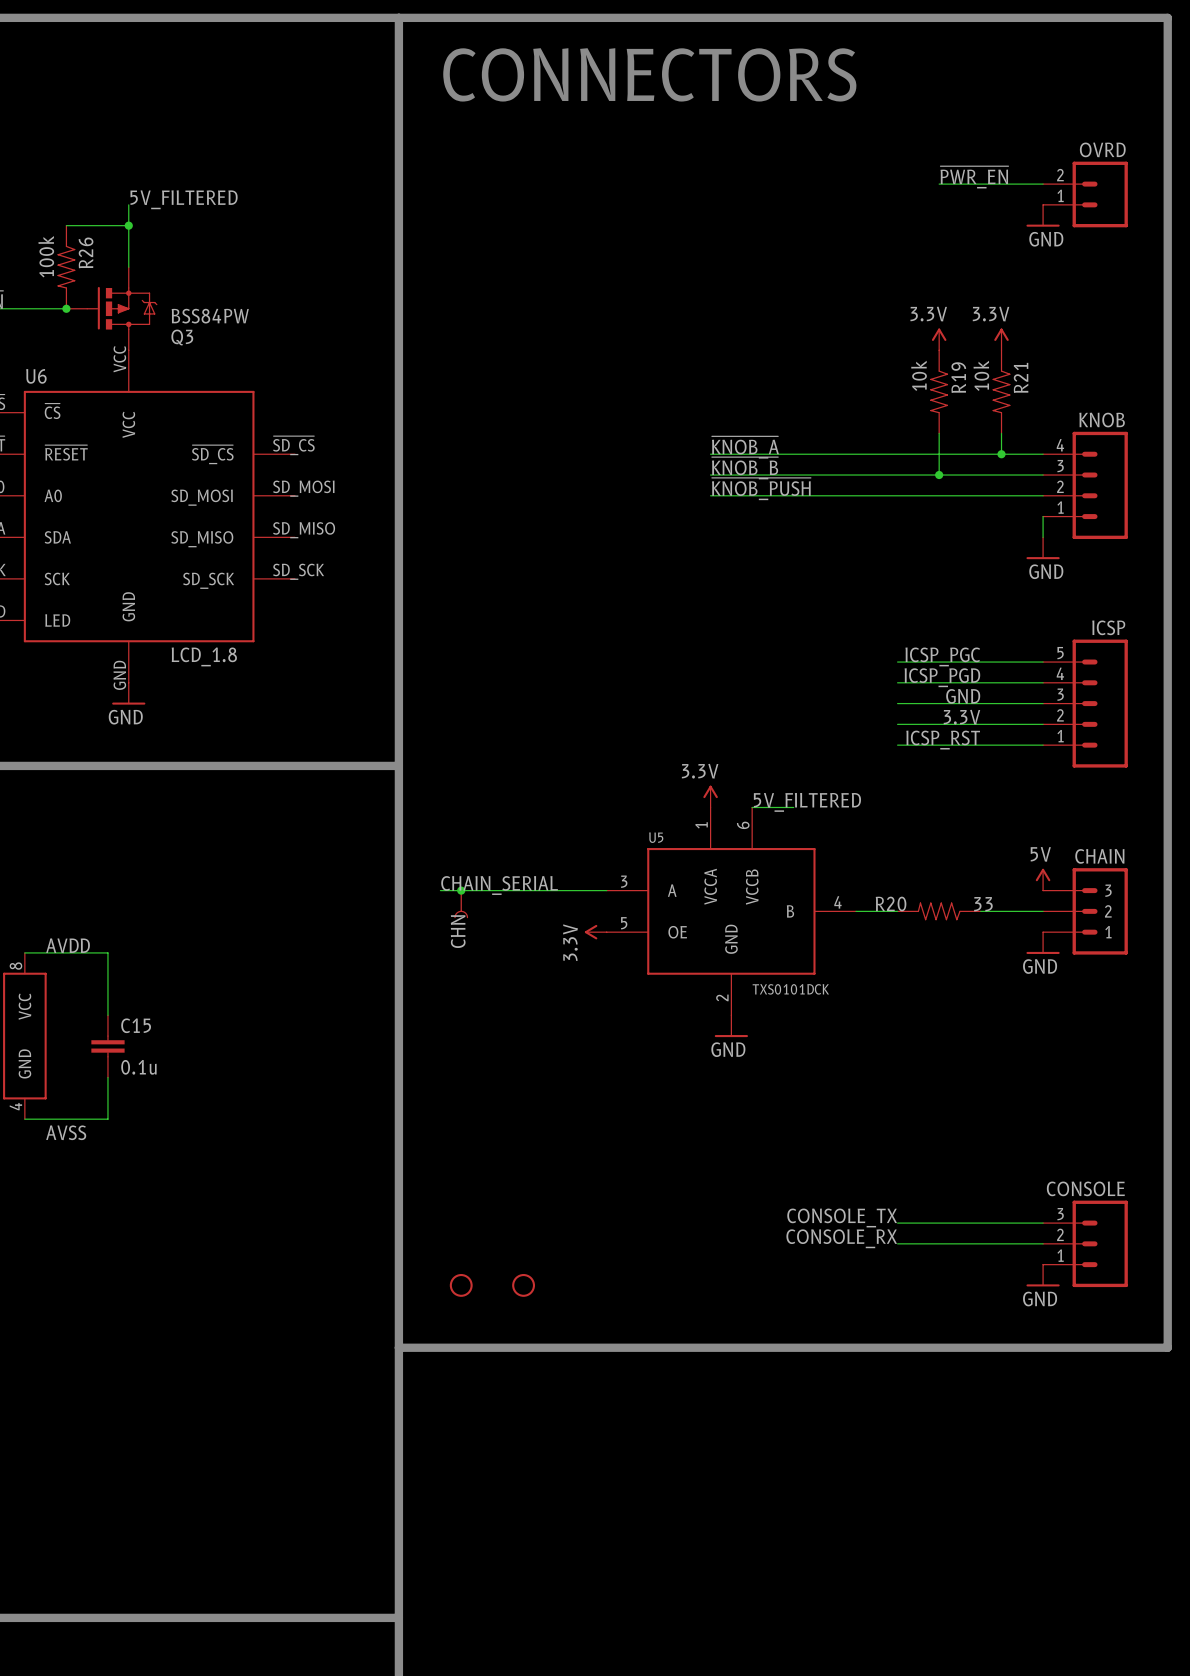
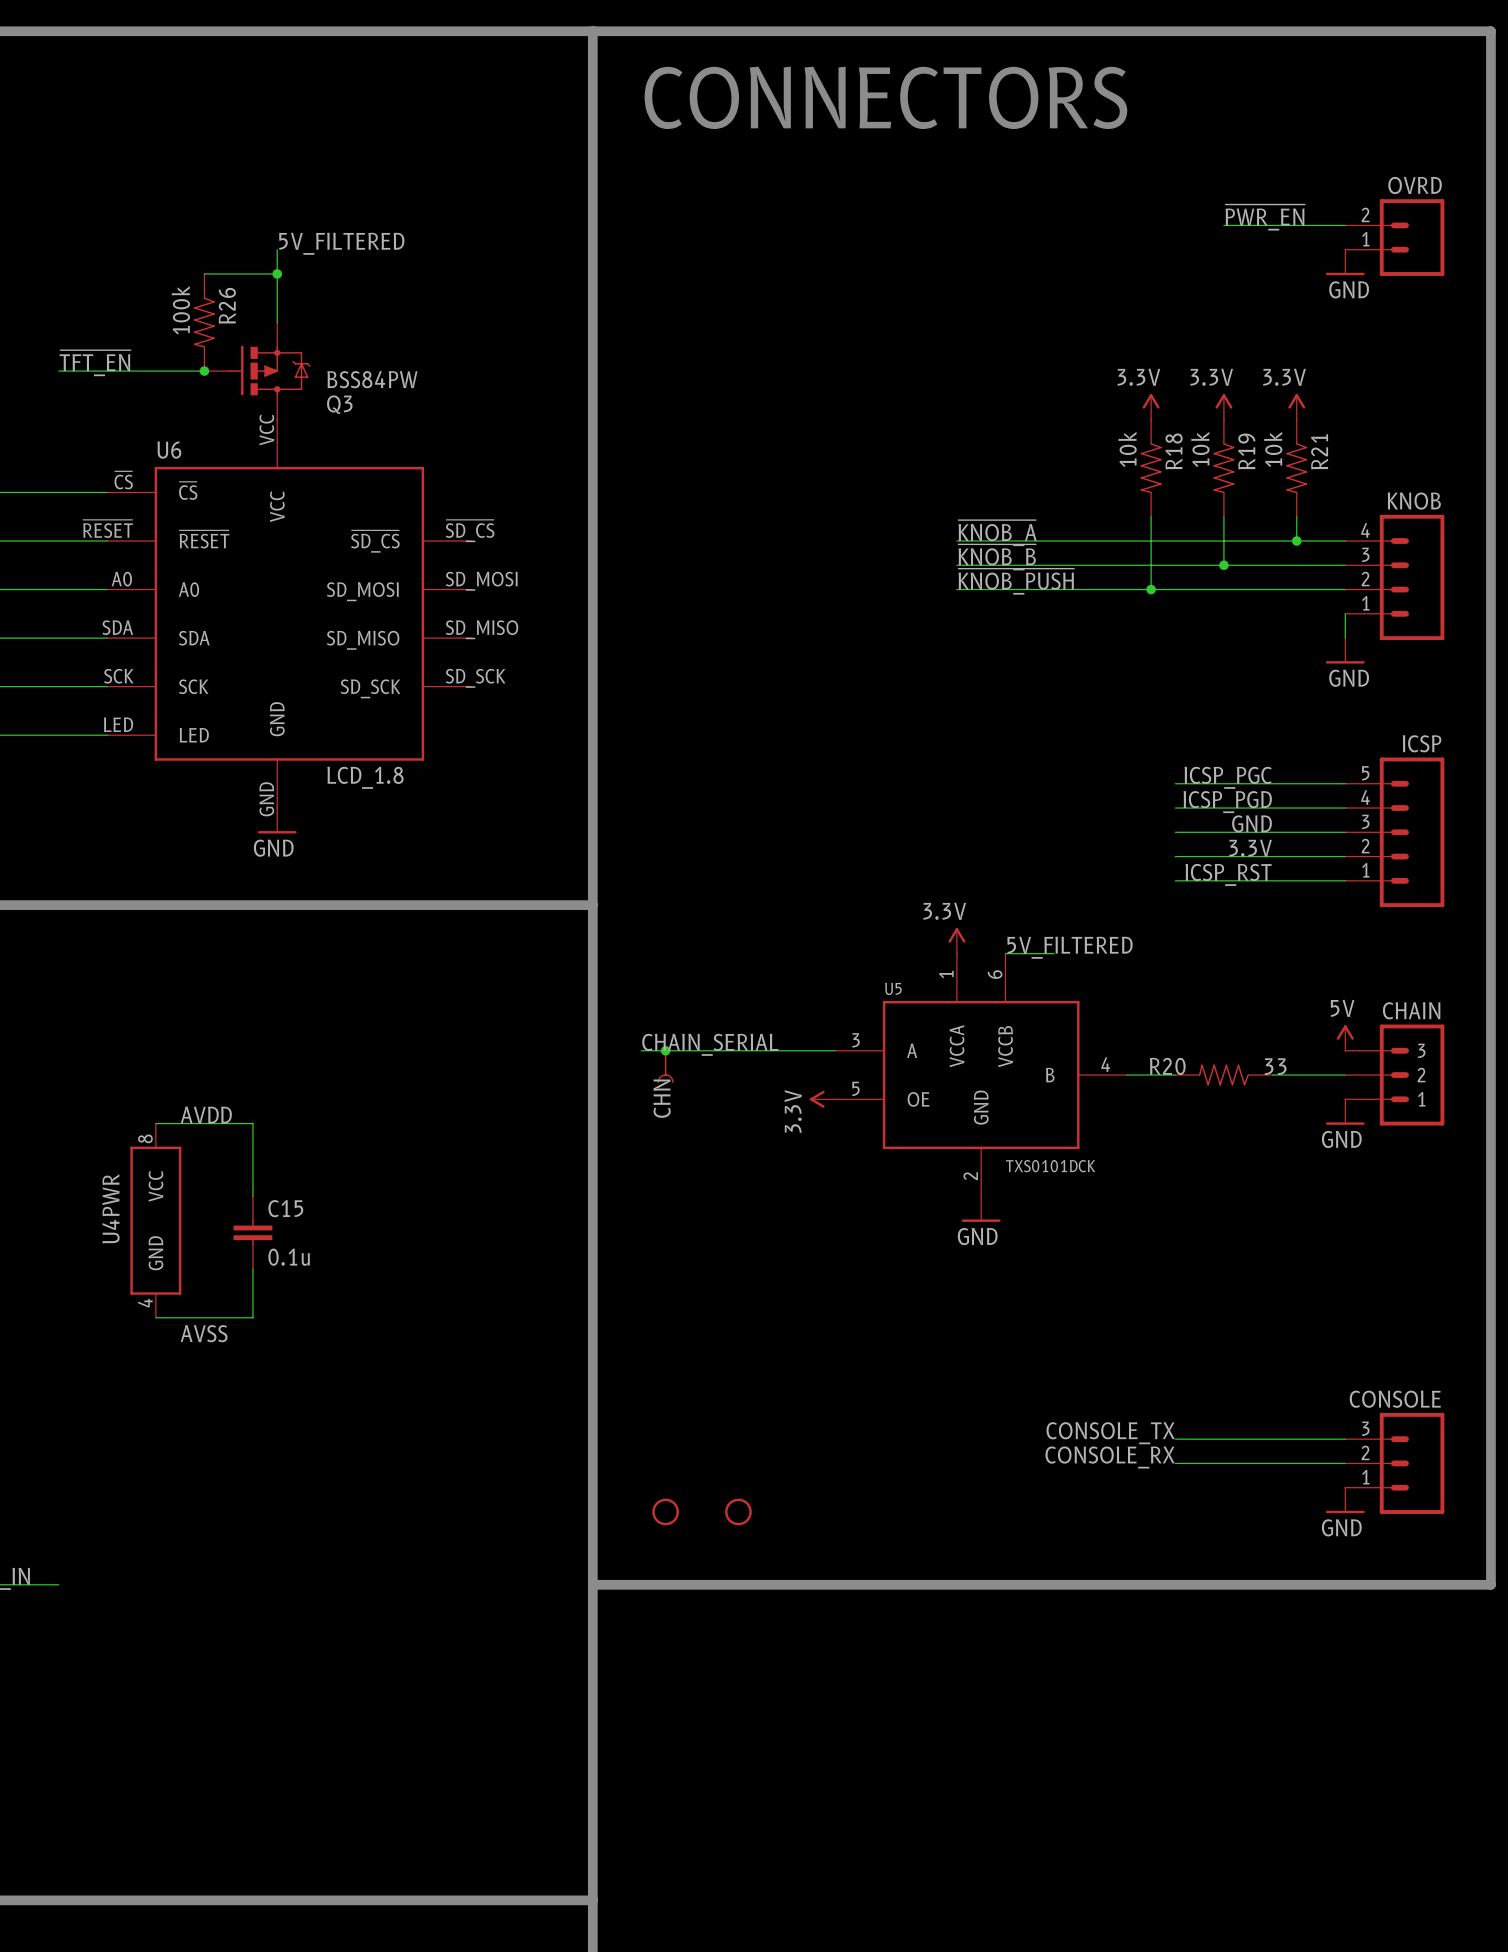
power symbol: none -> 3.3V (1151, 406)
R18: none -> 10k (1151, 468)
wire: none -> (1151, 516) (1151, 589)
junction: none -> (1151, 589)

